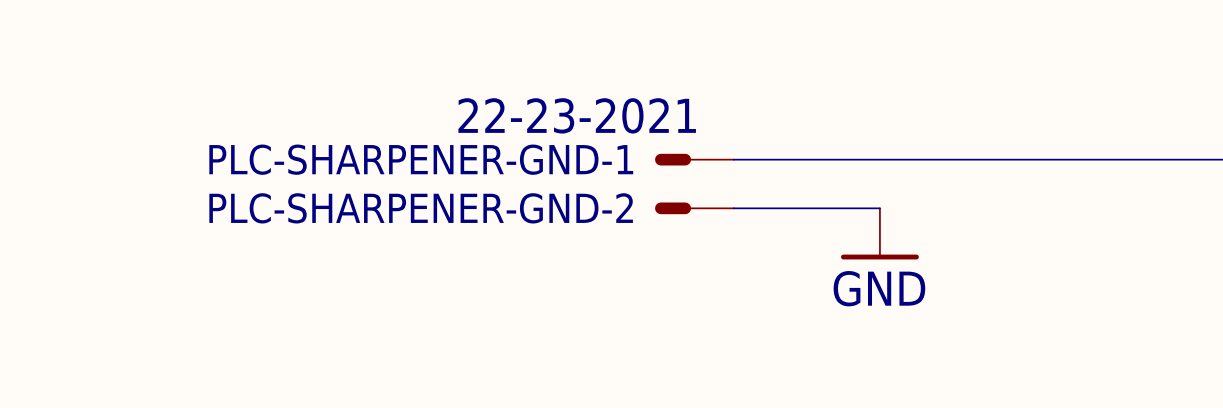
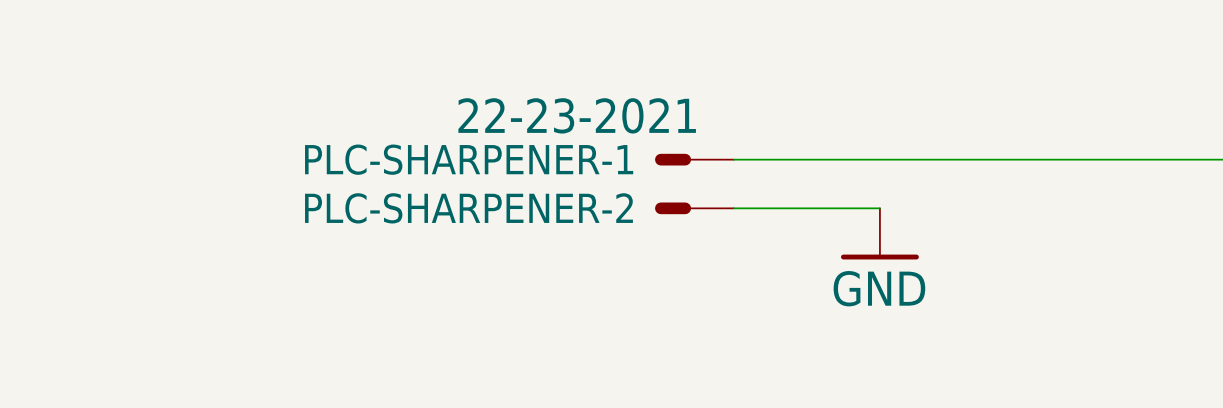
PLC-SHARPENER-GND-1 name: PLC-SHARPENER-GND-1 (421, 159) -> PLC-SHARPENER-1 (469, 159)
PLC-SHARPENER-GND-2 name: PLC-SHARPENER-GND-2 (421, 208) -> PLC-SHARPENER-2 (468, 208)

